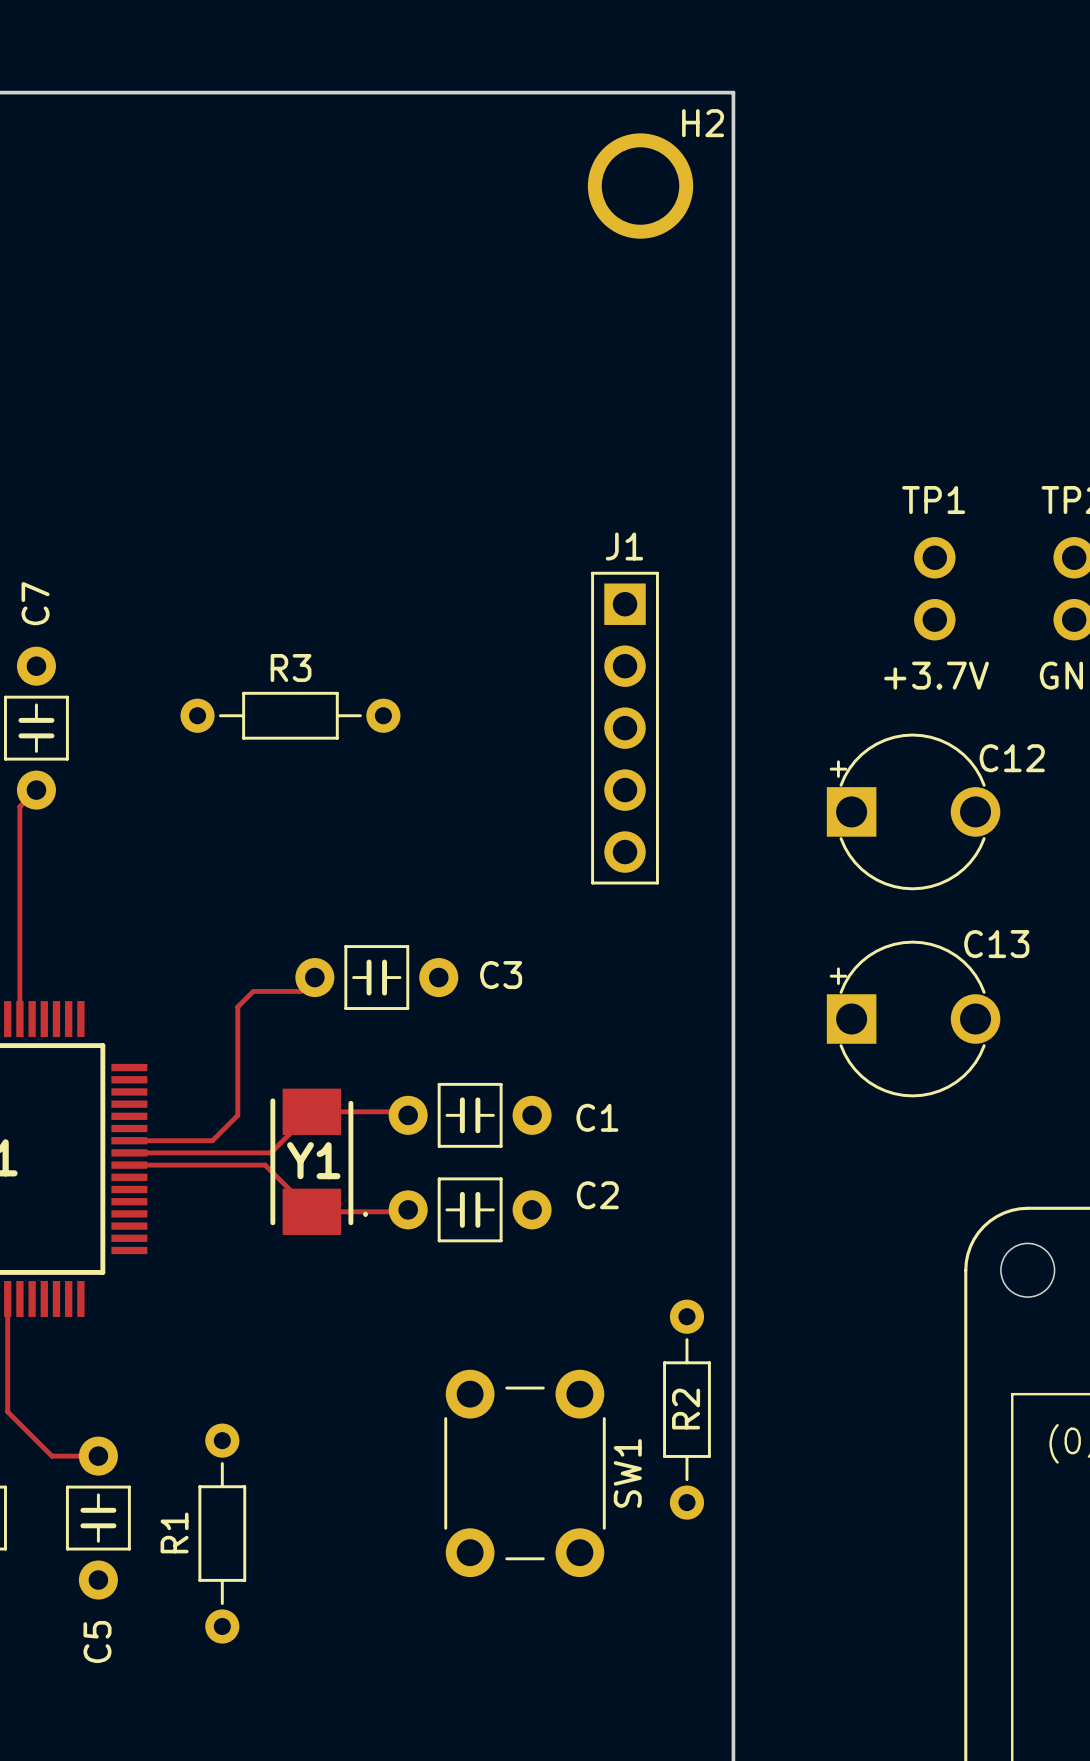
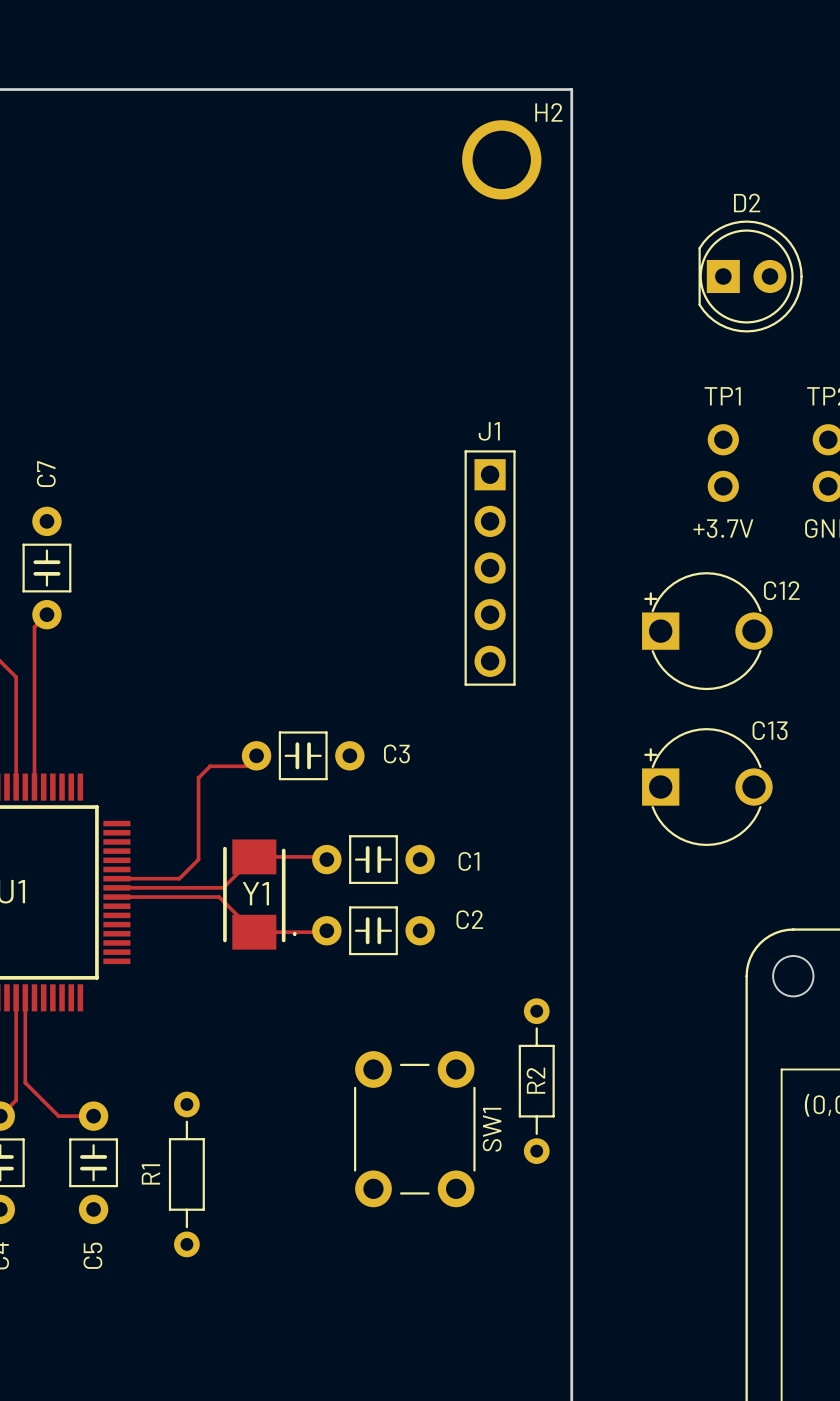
D2: none -> (750, 276)
R3: (290, 715) -> none

